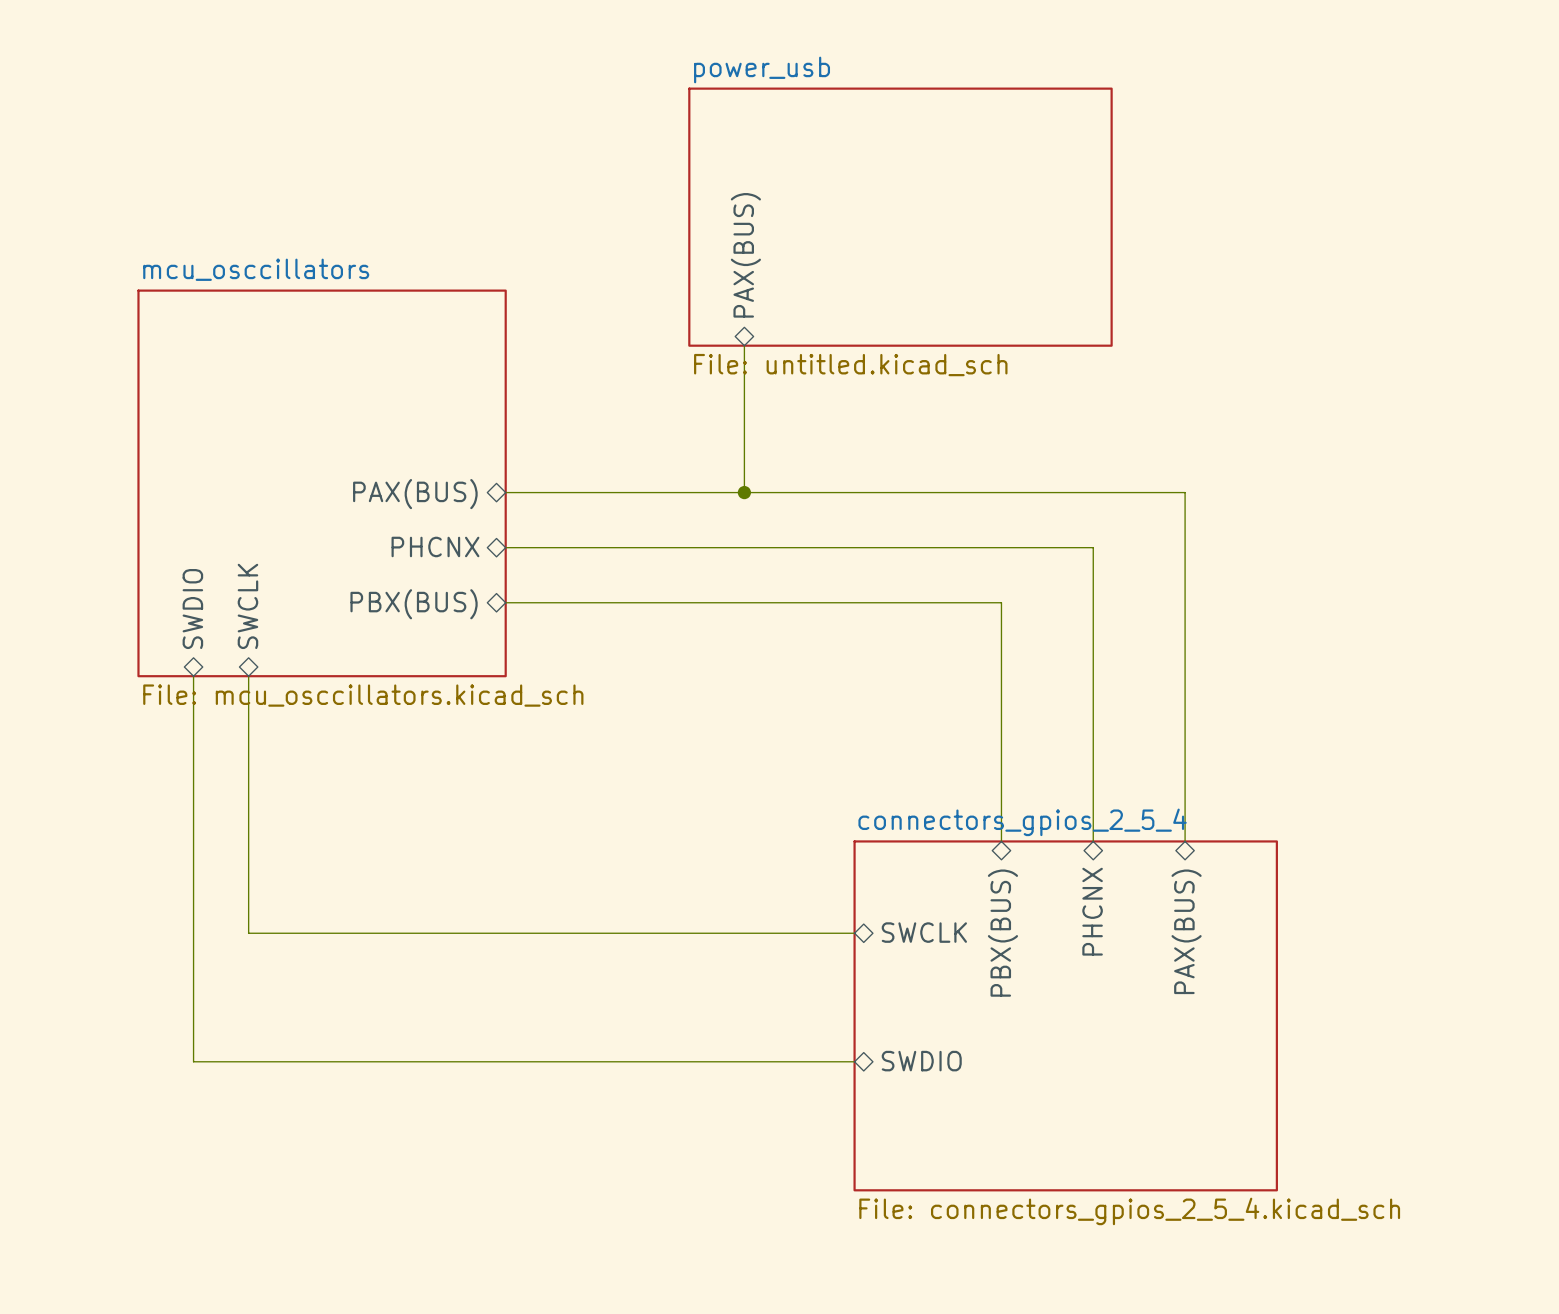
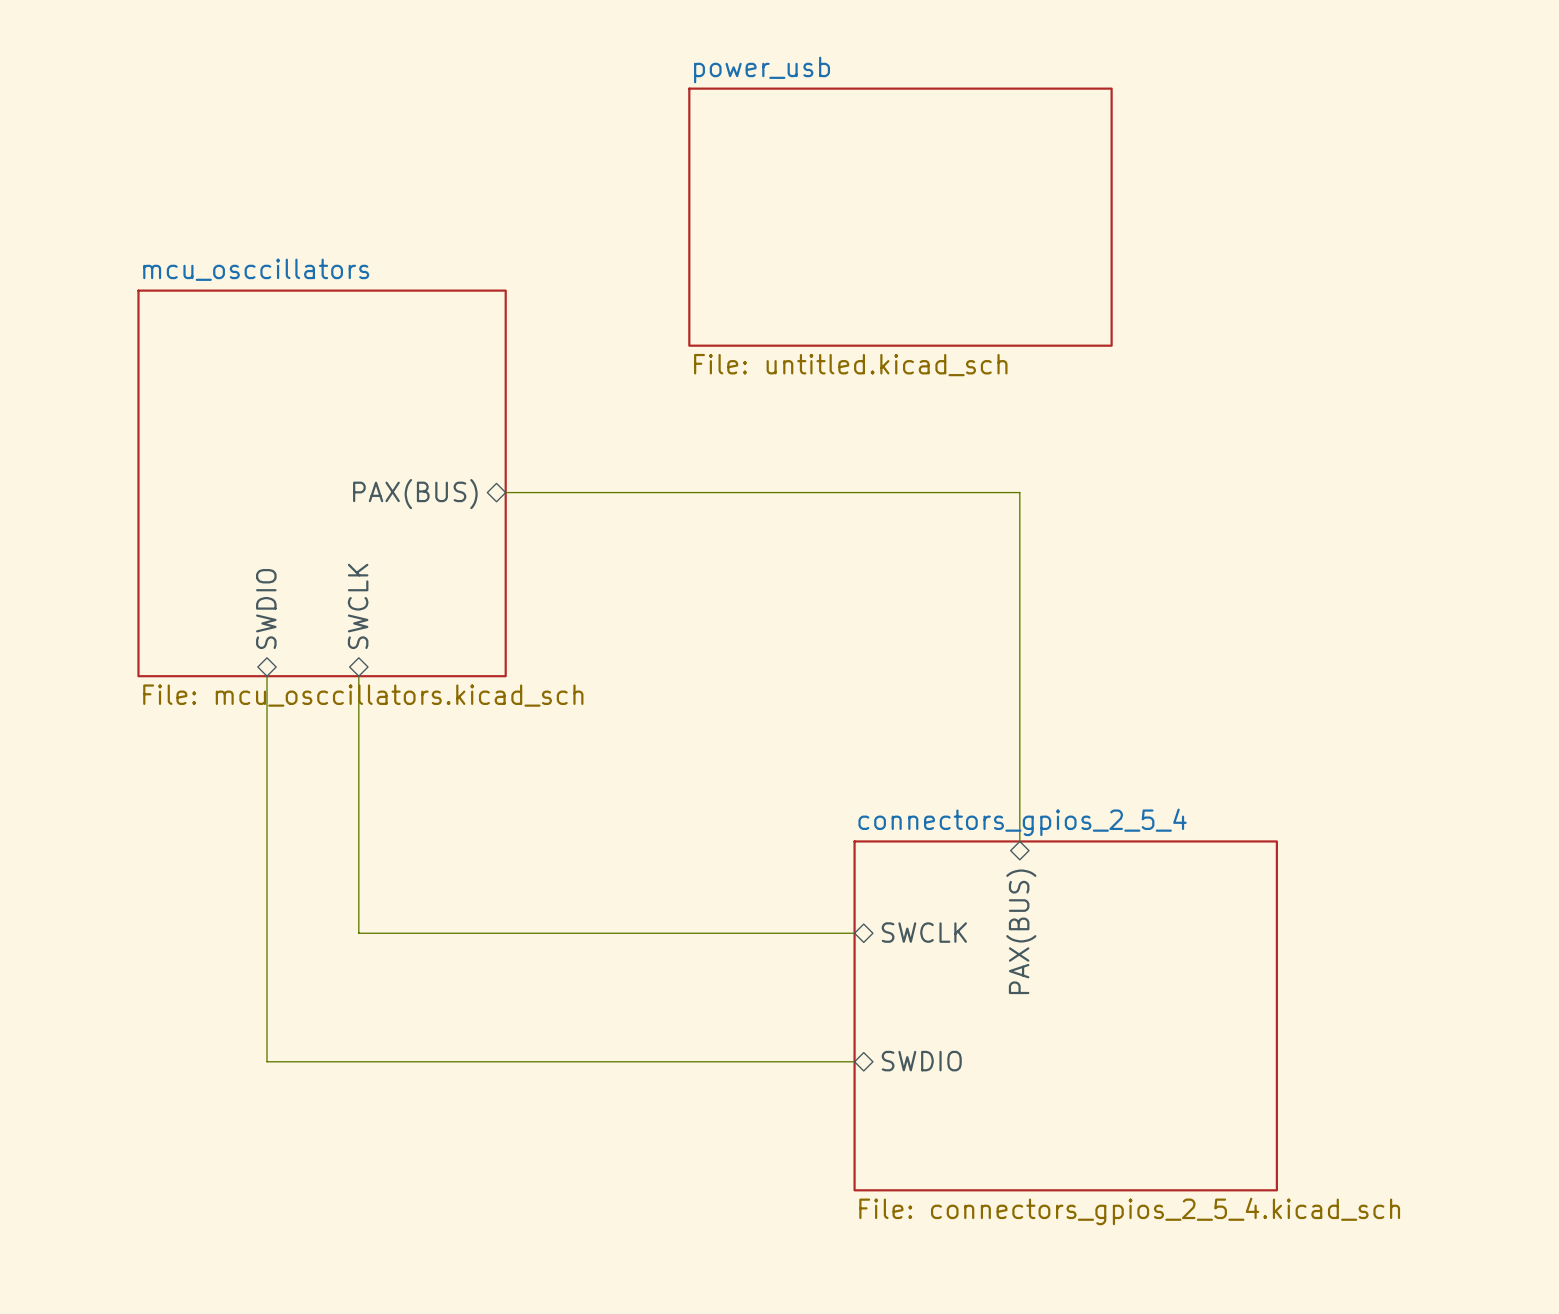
sheet pin: PAX(BUS) (745, 255) -> none
wire: (744, 345) (744, 492) -> none
junction: (744, 492) -> none
wire: (1019, 492) (1185, 492) (1185, 841) -> (1019, 492) (1019, 841)
sheet pin: PHCNX (435, 546) -> none
wire: (505, 547) (1093, 547) (1093, 841) -> none
wire: (505, 602) (1001, 602) (1001, 841) -> none
sheet pin: PBX(BUS) (414, 604) -> none
sheet pin position: SWCLK (247, 606) -> SWCLK (358, 606)
sheet pin position: SWDIO (192, 609) -> SWDIO (266, 609)
wire: (193, 676) (193, 1061) (267, 1061) -> (267, 676) (267, 1061)
wire: (248, 676) (248, 933) (358, 933) -> (358, 676) (358, 933)
sheet pin: PHCNX (1092, 911) -> none
sheet pin position: PAX(BUS) (1186, 931) -> PAX(BUS) (1021, 931)
sheet pin: PBX(BUS) (1002, 933) -> none

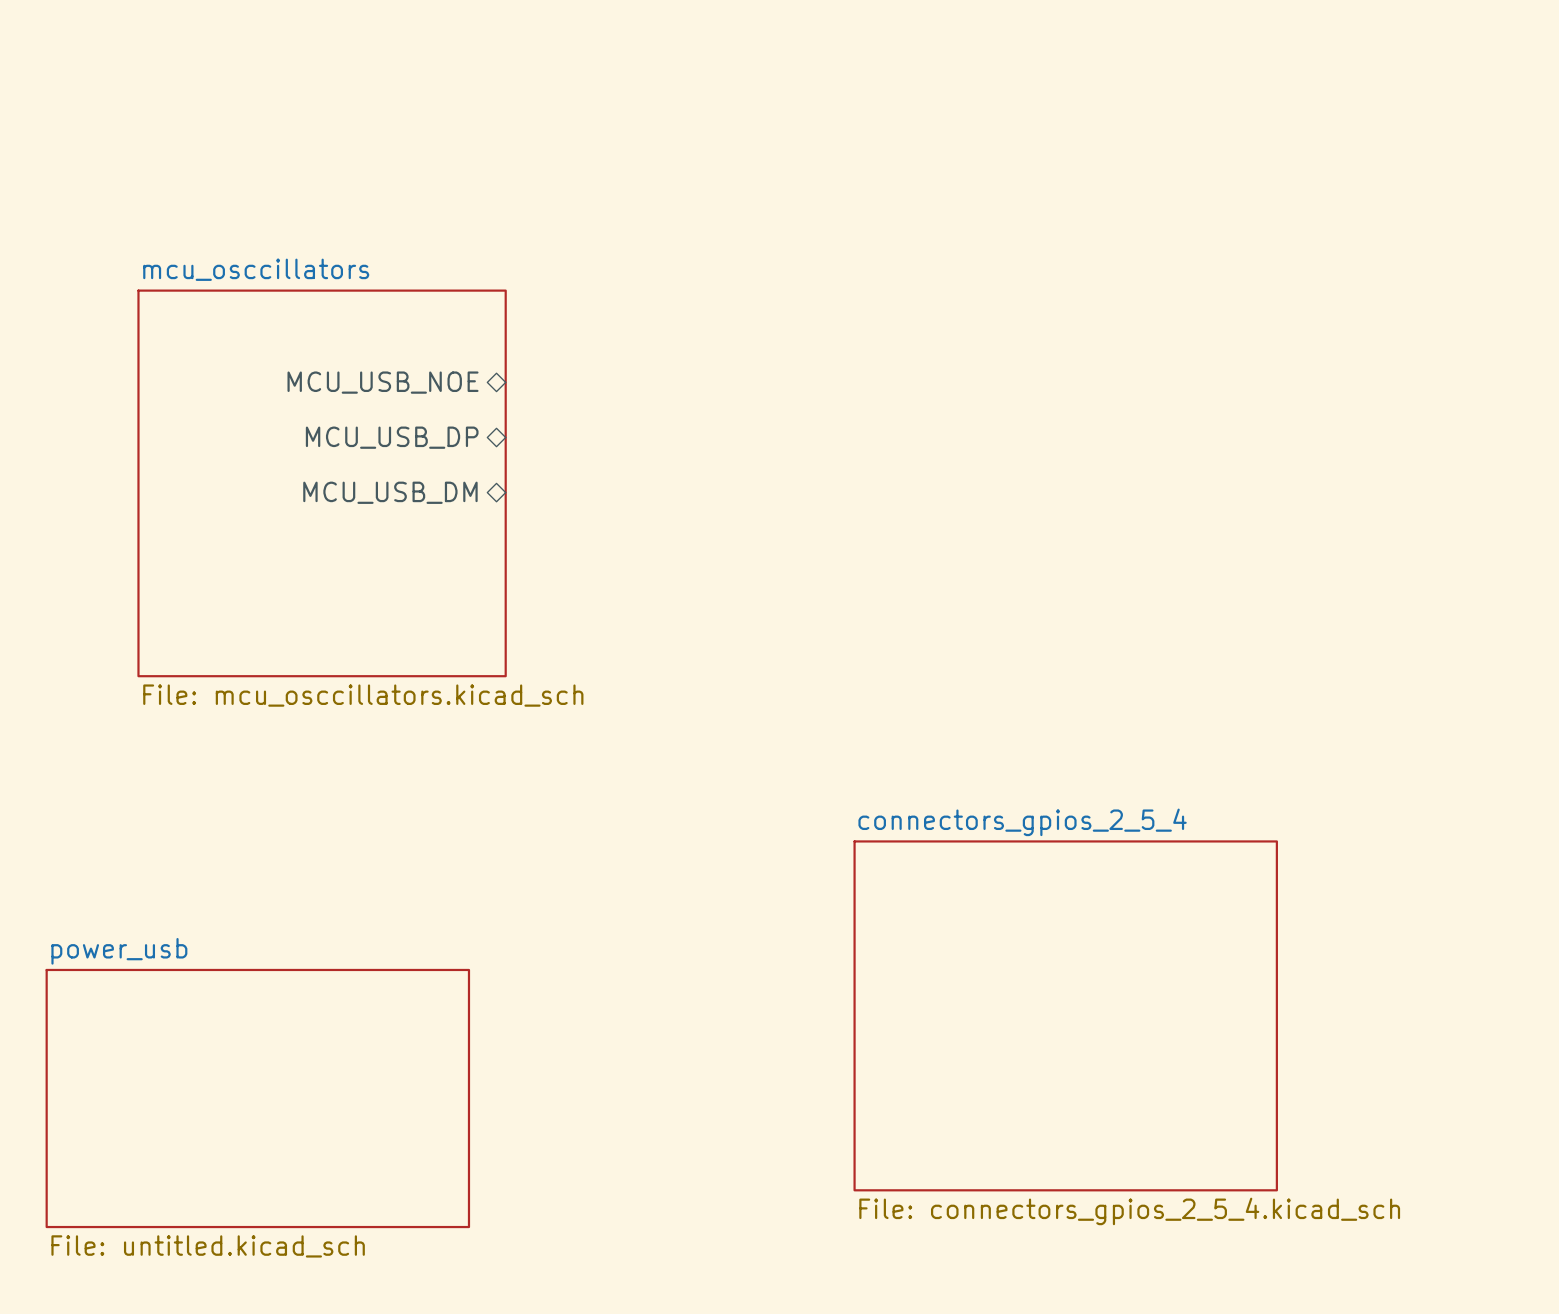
sheet power_usb: File: untitled.kicad_sch (900, 217) -> none
sheet pin: none -> MCU_USB_NOE (383, 382)
sheet pin: none -> MCU_USB_DP (392, 437)
wire: (505, 492) (1019, 492) (1019, 841) -> none
sheet pin: PAX(BUS) (415, 494) -> MCU_USB_DM (390, 492)
sheet pin: SWCLK (358, 606) -> none
sheet pin: SWDIO (266, 609) -> none
wire: (267, 676) (267, 1061) (854, 1061) -> none
wire: (358, 676) (358, 933) (854, 933) -> none
sheet pin: PAX(BUS) (1021, 931) -> none
sheet pin: SWCLK (924, 932) -> none
sheet pin: SWDIO (921, 1061) -> none
sheet power_usb: none -> File: untitled.kicad_sch (257, 1098)

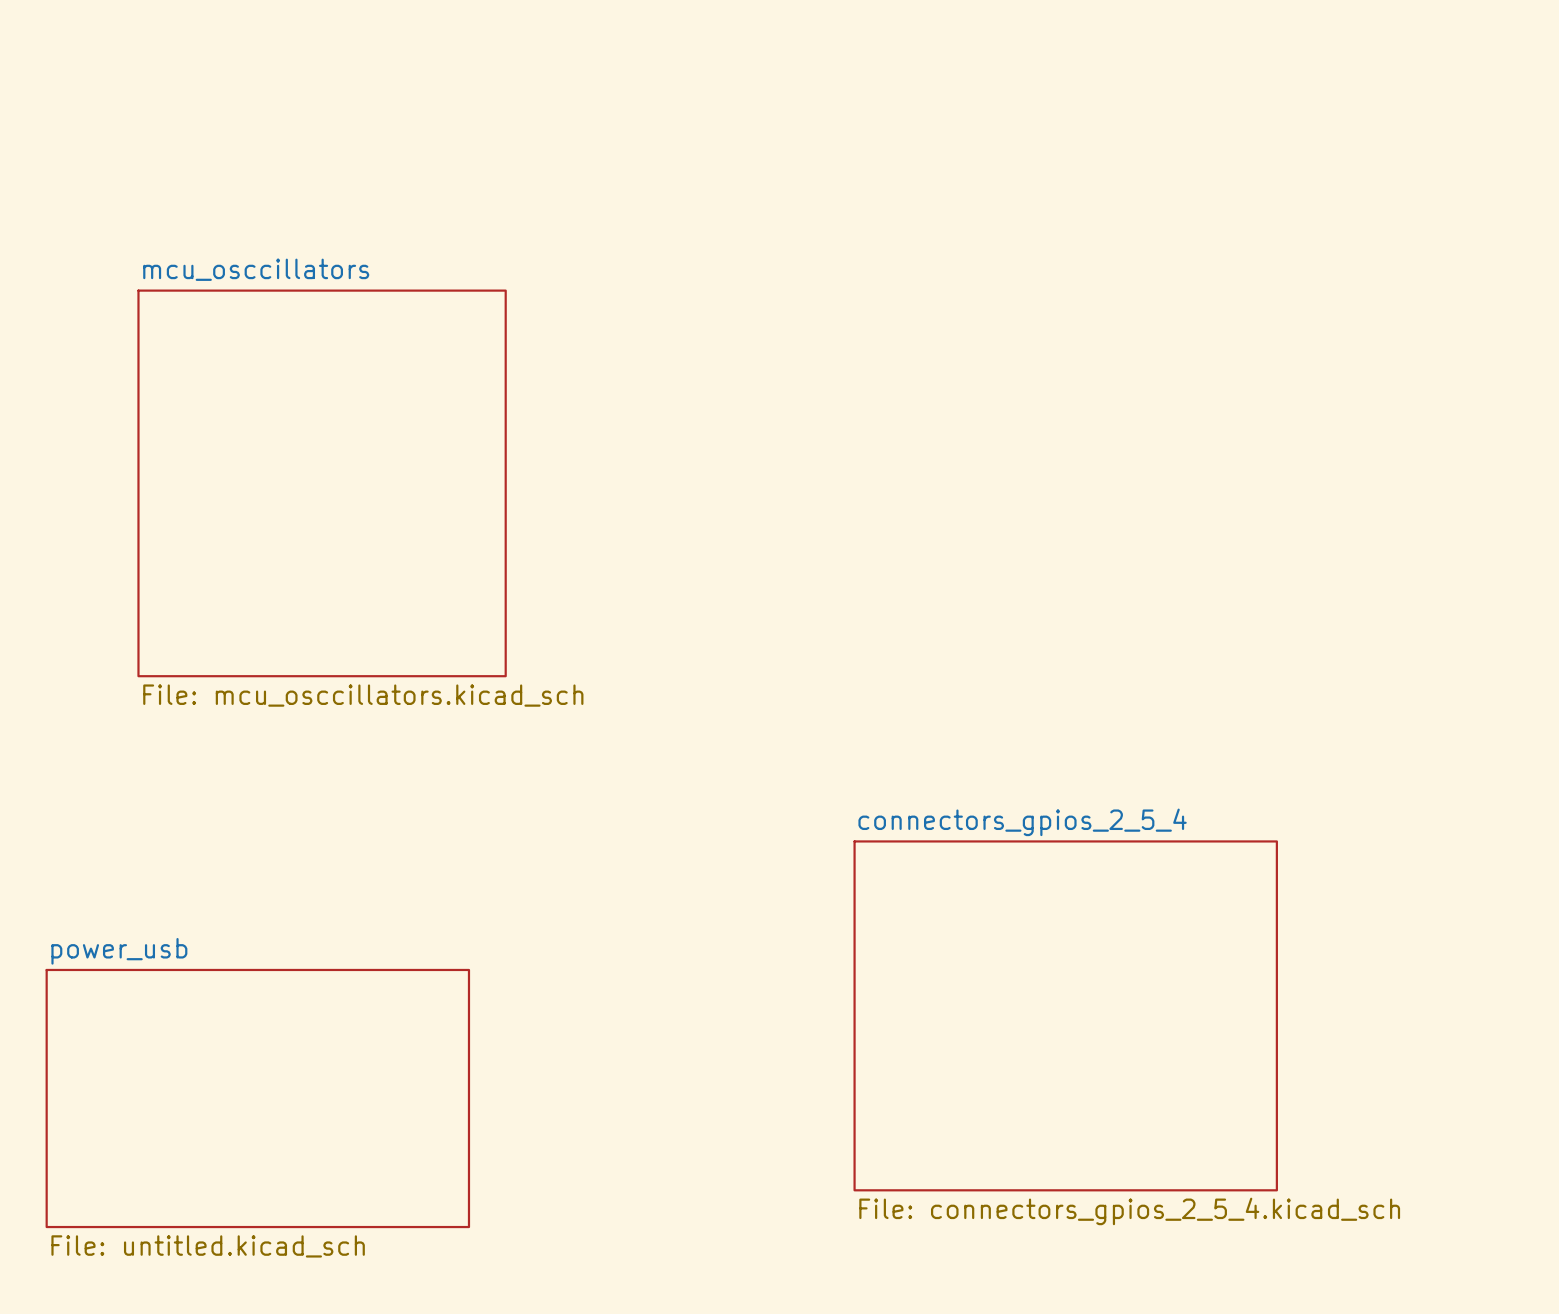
sheet pin: MCU_USB_NOE (383, 382) -> none
sheet pin: MCU_USB_DP (392, 437) -> none
sheet pin: MCU_USB_DM (390, 492) -> none

